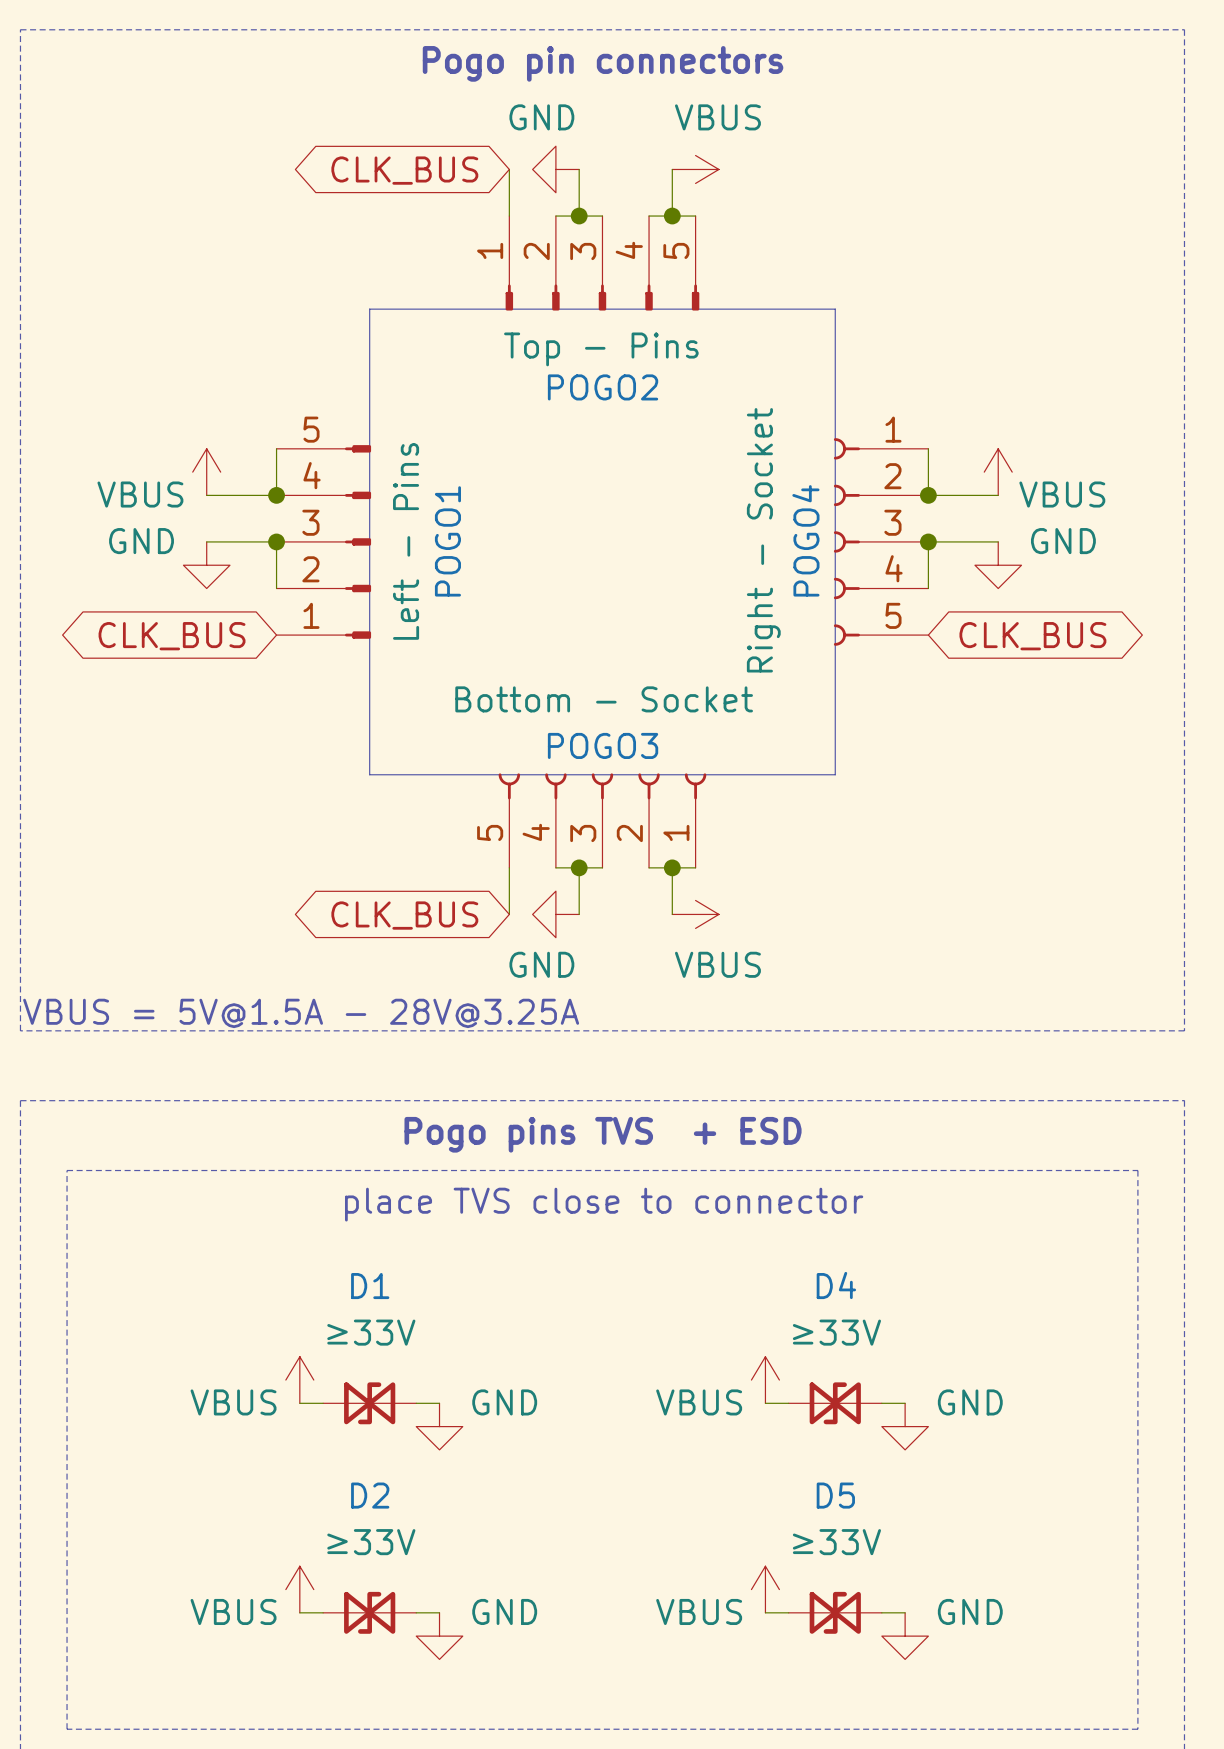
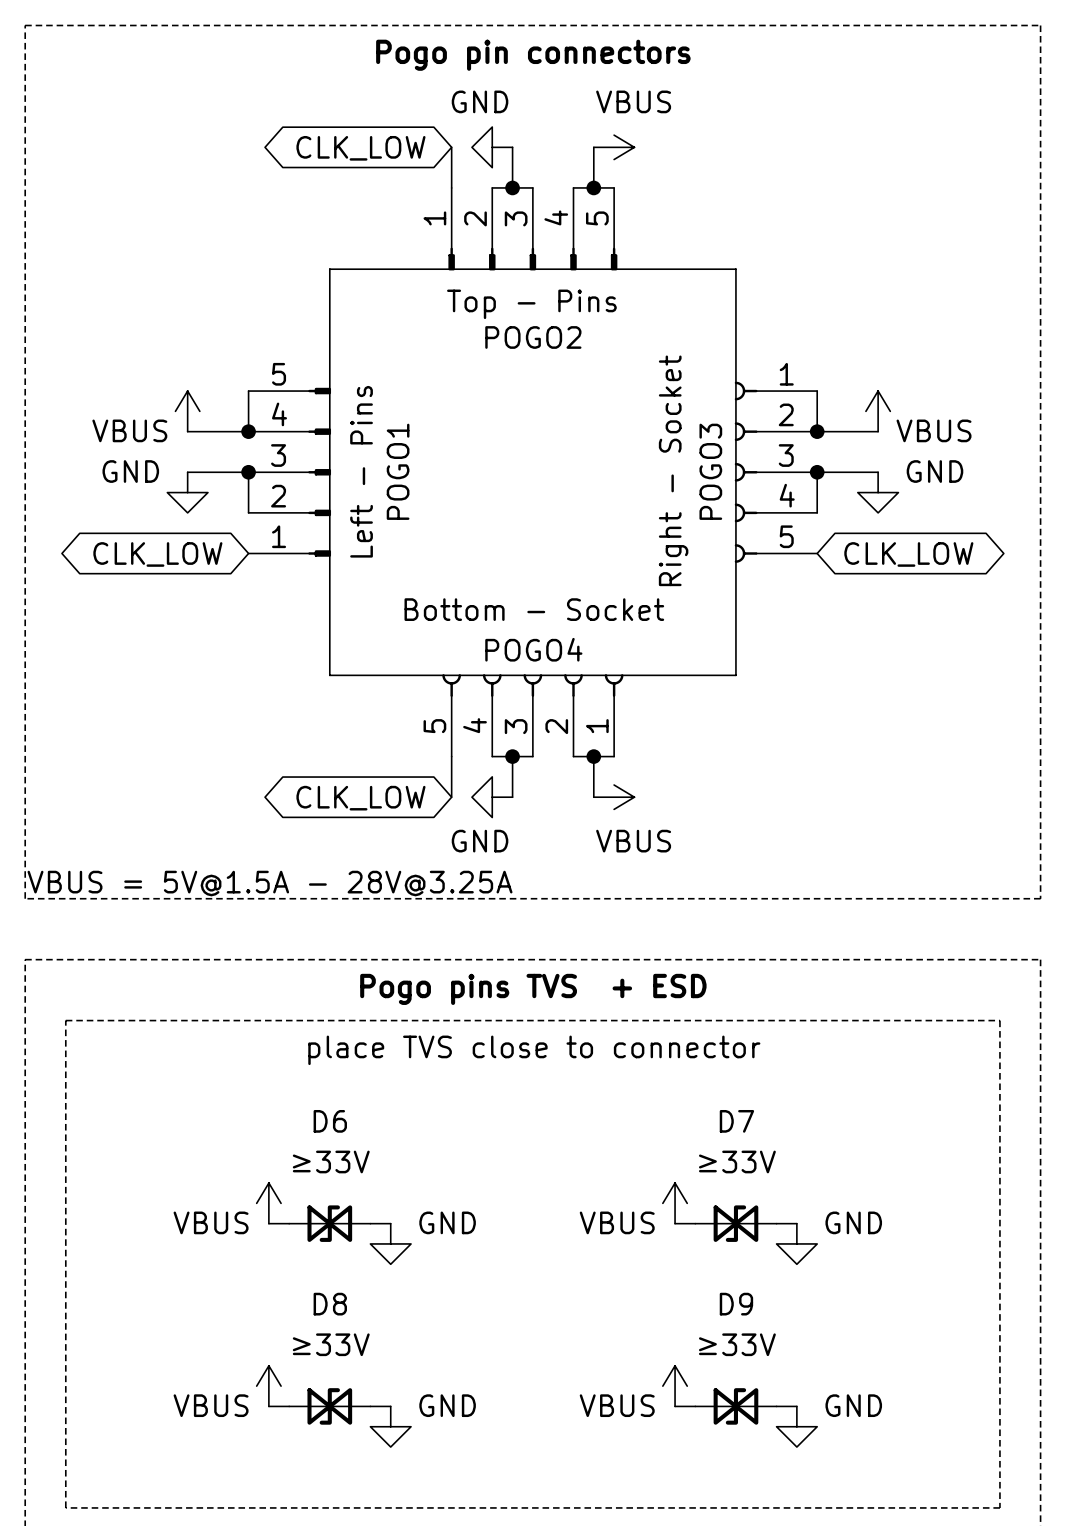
global label: CLK_BUS (404, 170) -> CLK_LOW (360, 148)
POGO4 name: POGO4 (805, 540) -> POGO3 (710, 471)
global label: CLK_BUS (172, 636) -> CLK_LOW (157, 554)
global label: CLK_BUS (1032, 636) -> CLK_LOW (908, 554)
POGO3 name: POGO3 (603, 745) -> POGO4 (533, 649)
global label: CLK_BUS (404, 915) -> CLK_LOW (360, 798)
D4 name: D4 (836, 1285) -> D7 (736, 1121)
D1 name: D1 (370, 1286) -> D6 (330, 1121)
D2 name: D2 (370, 1495) -> D8 (330, 1304)
D5 name: D5 (835, 1495) -> D9 (736, 1304)

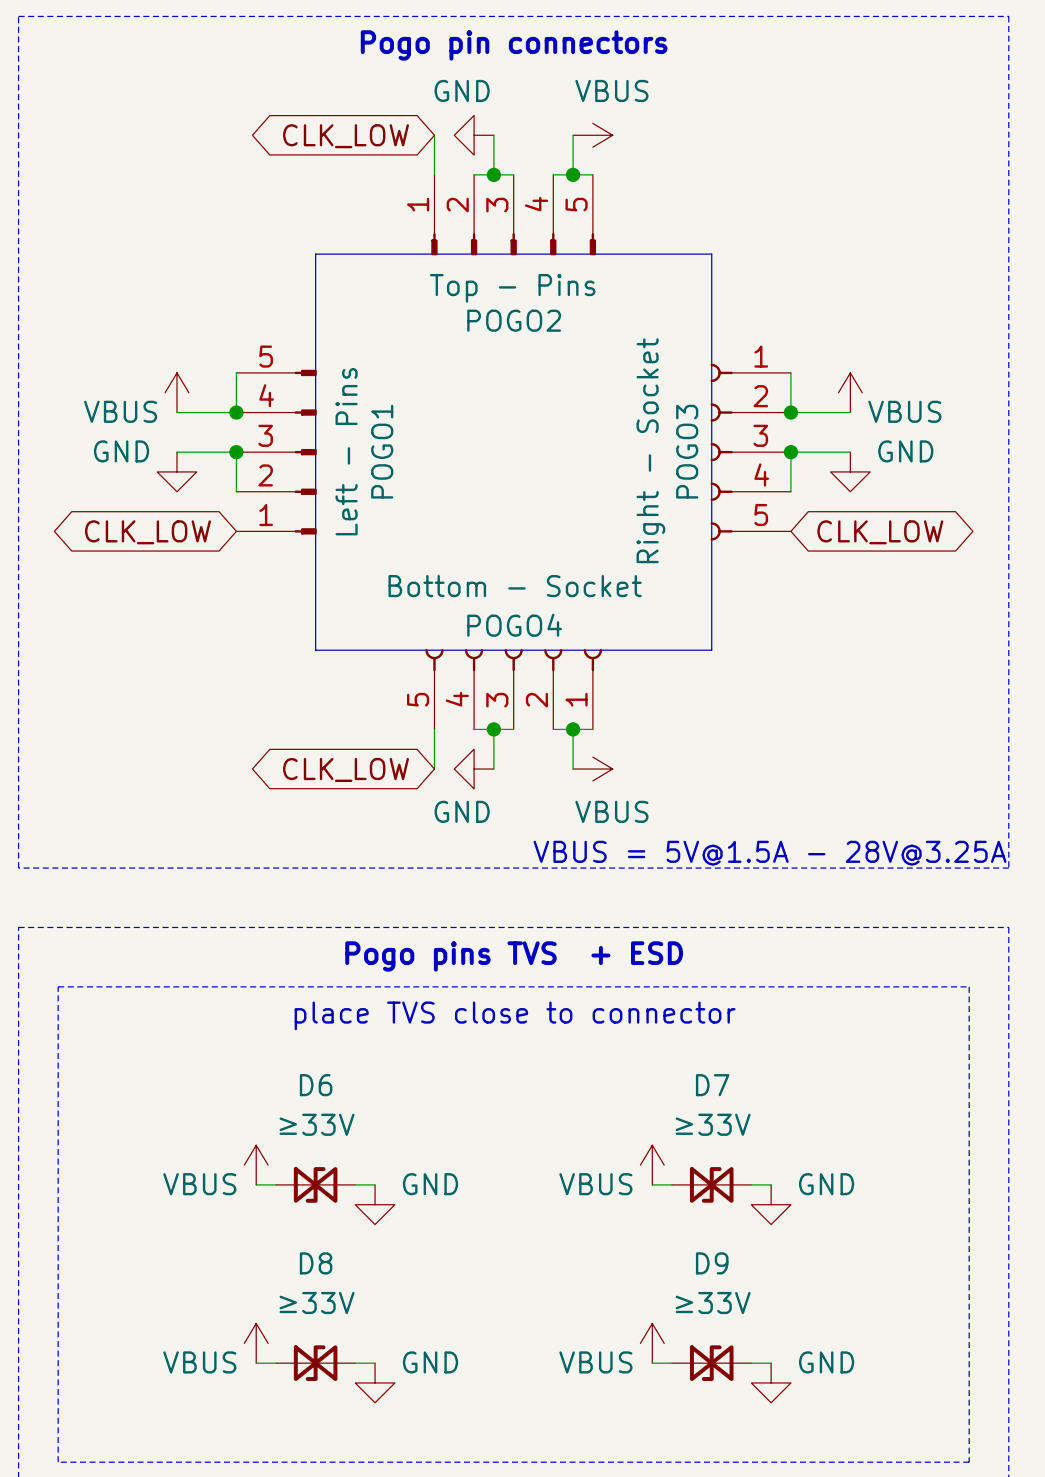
text: VBUS = 5V@1.5A - 28V@3.25A (270, 883) -> none
text: none -> VBUS = 5V@1.5A - 28V@3.25A (770, 853)

